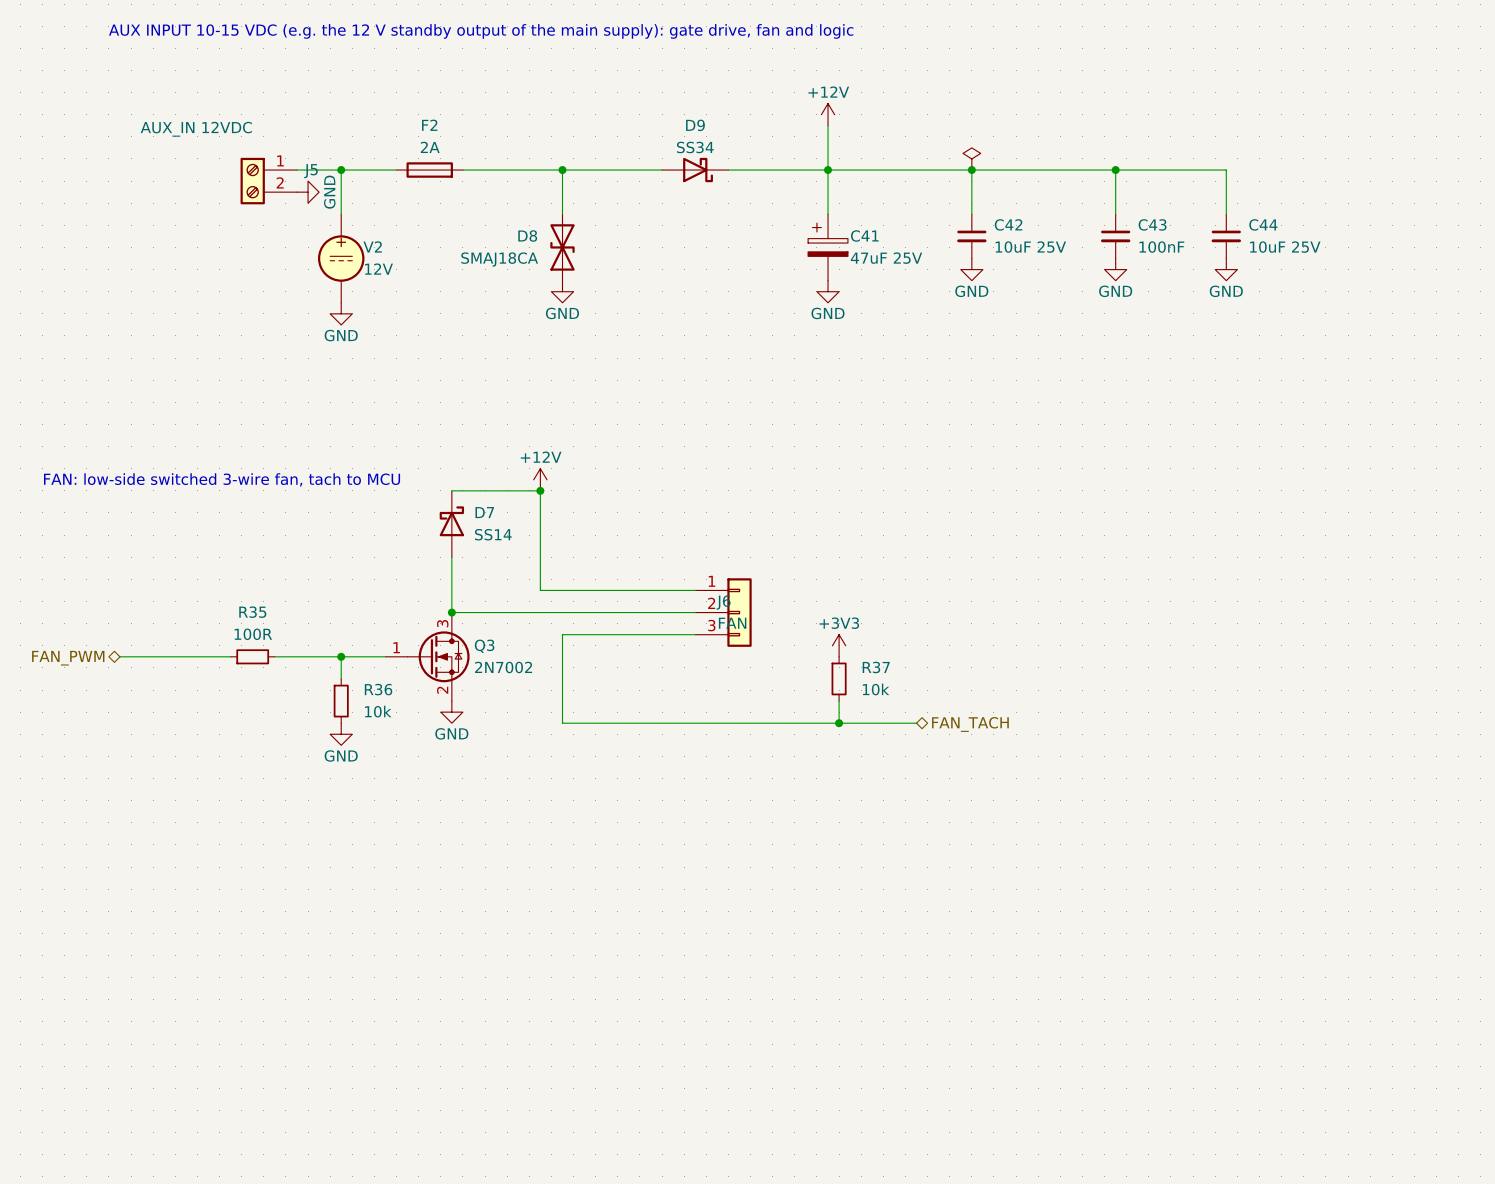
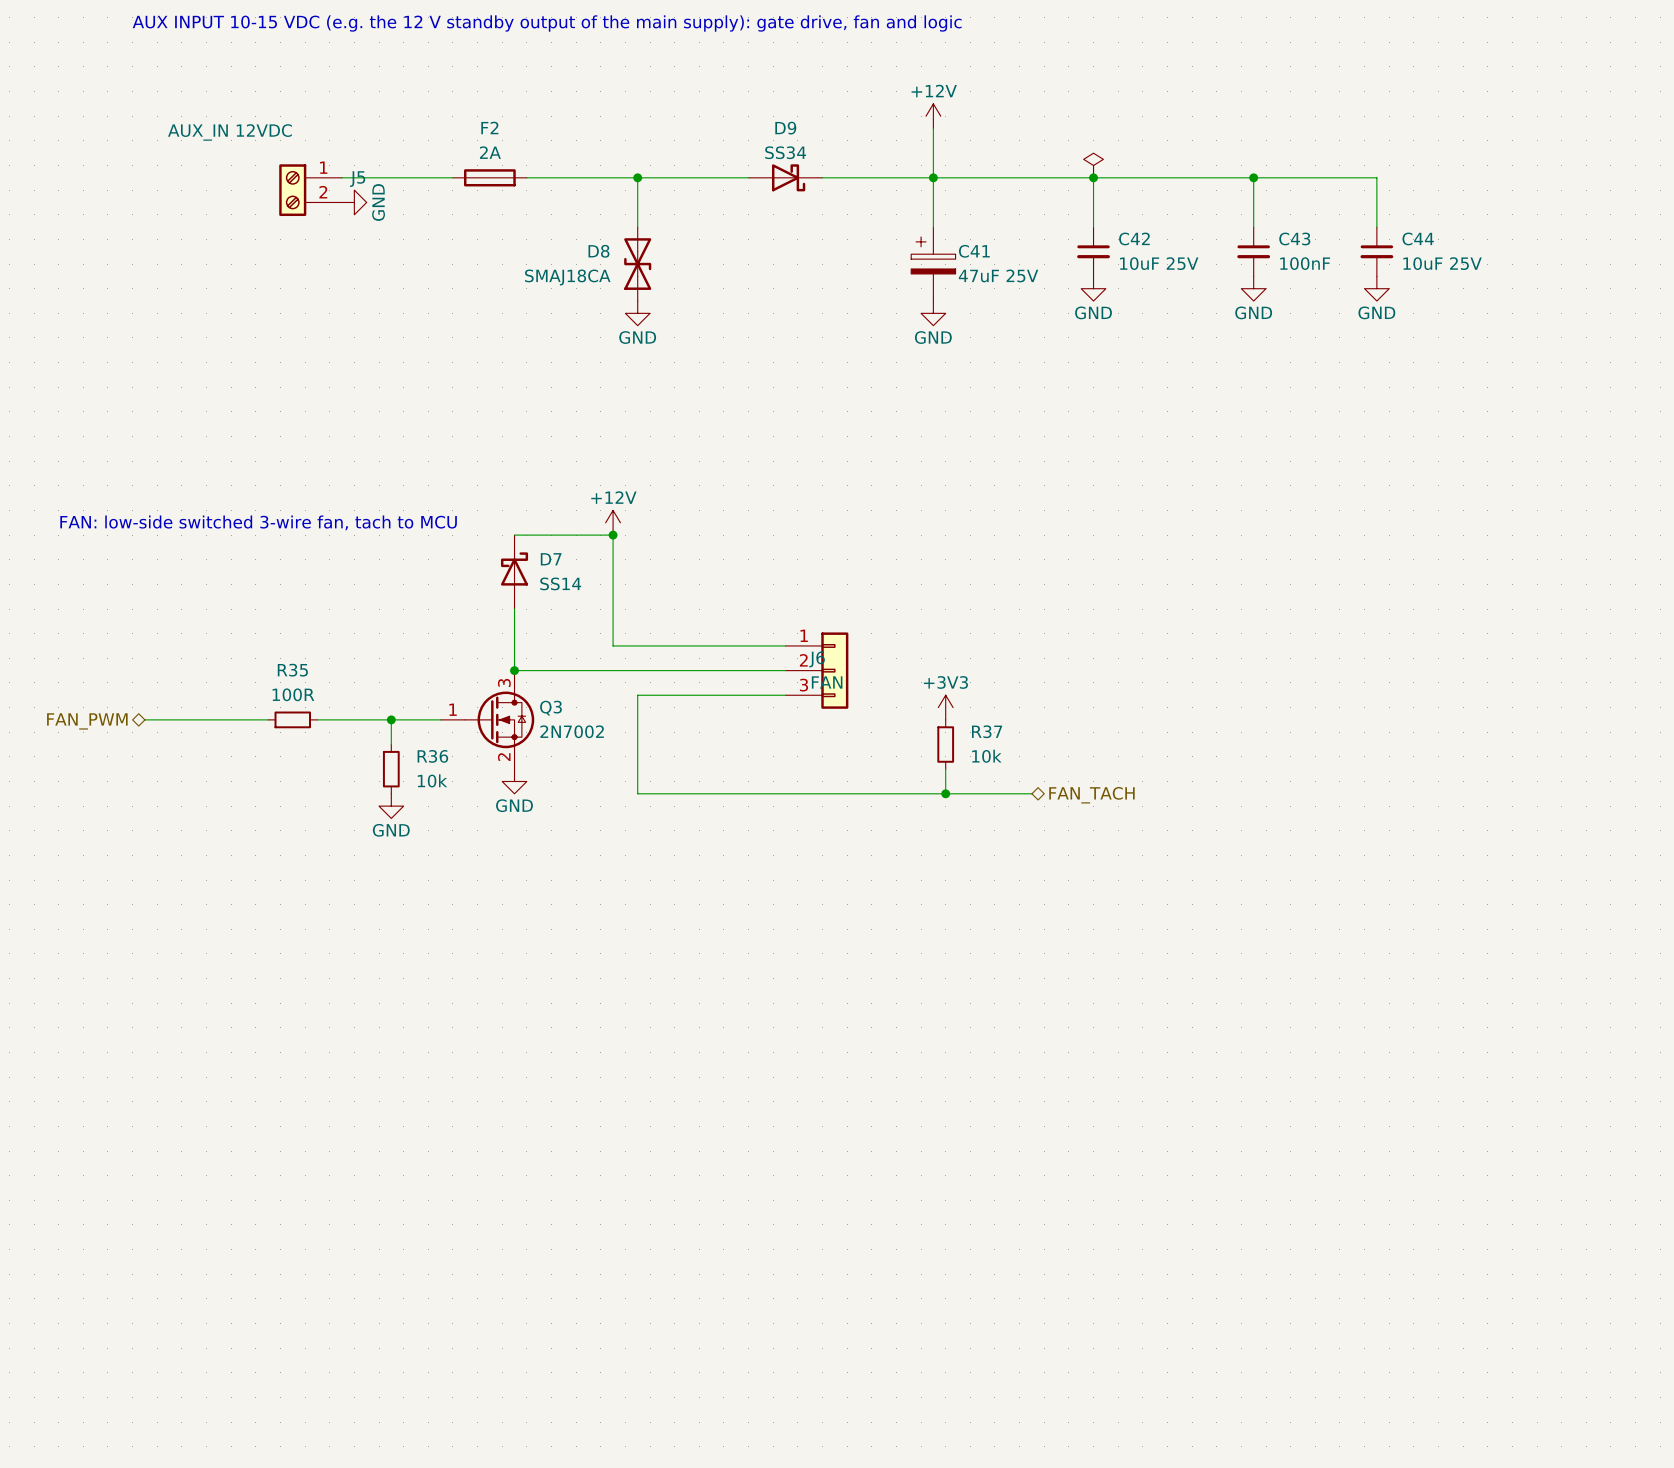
wire: (341, 170) (341, 214) -> none
junction: (341, 170) -> none
V2: 12V (341, 258) -> none
power symbol: GND (341, 313) -> none

